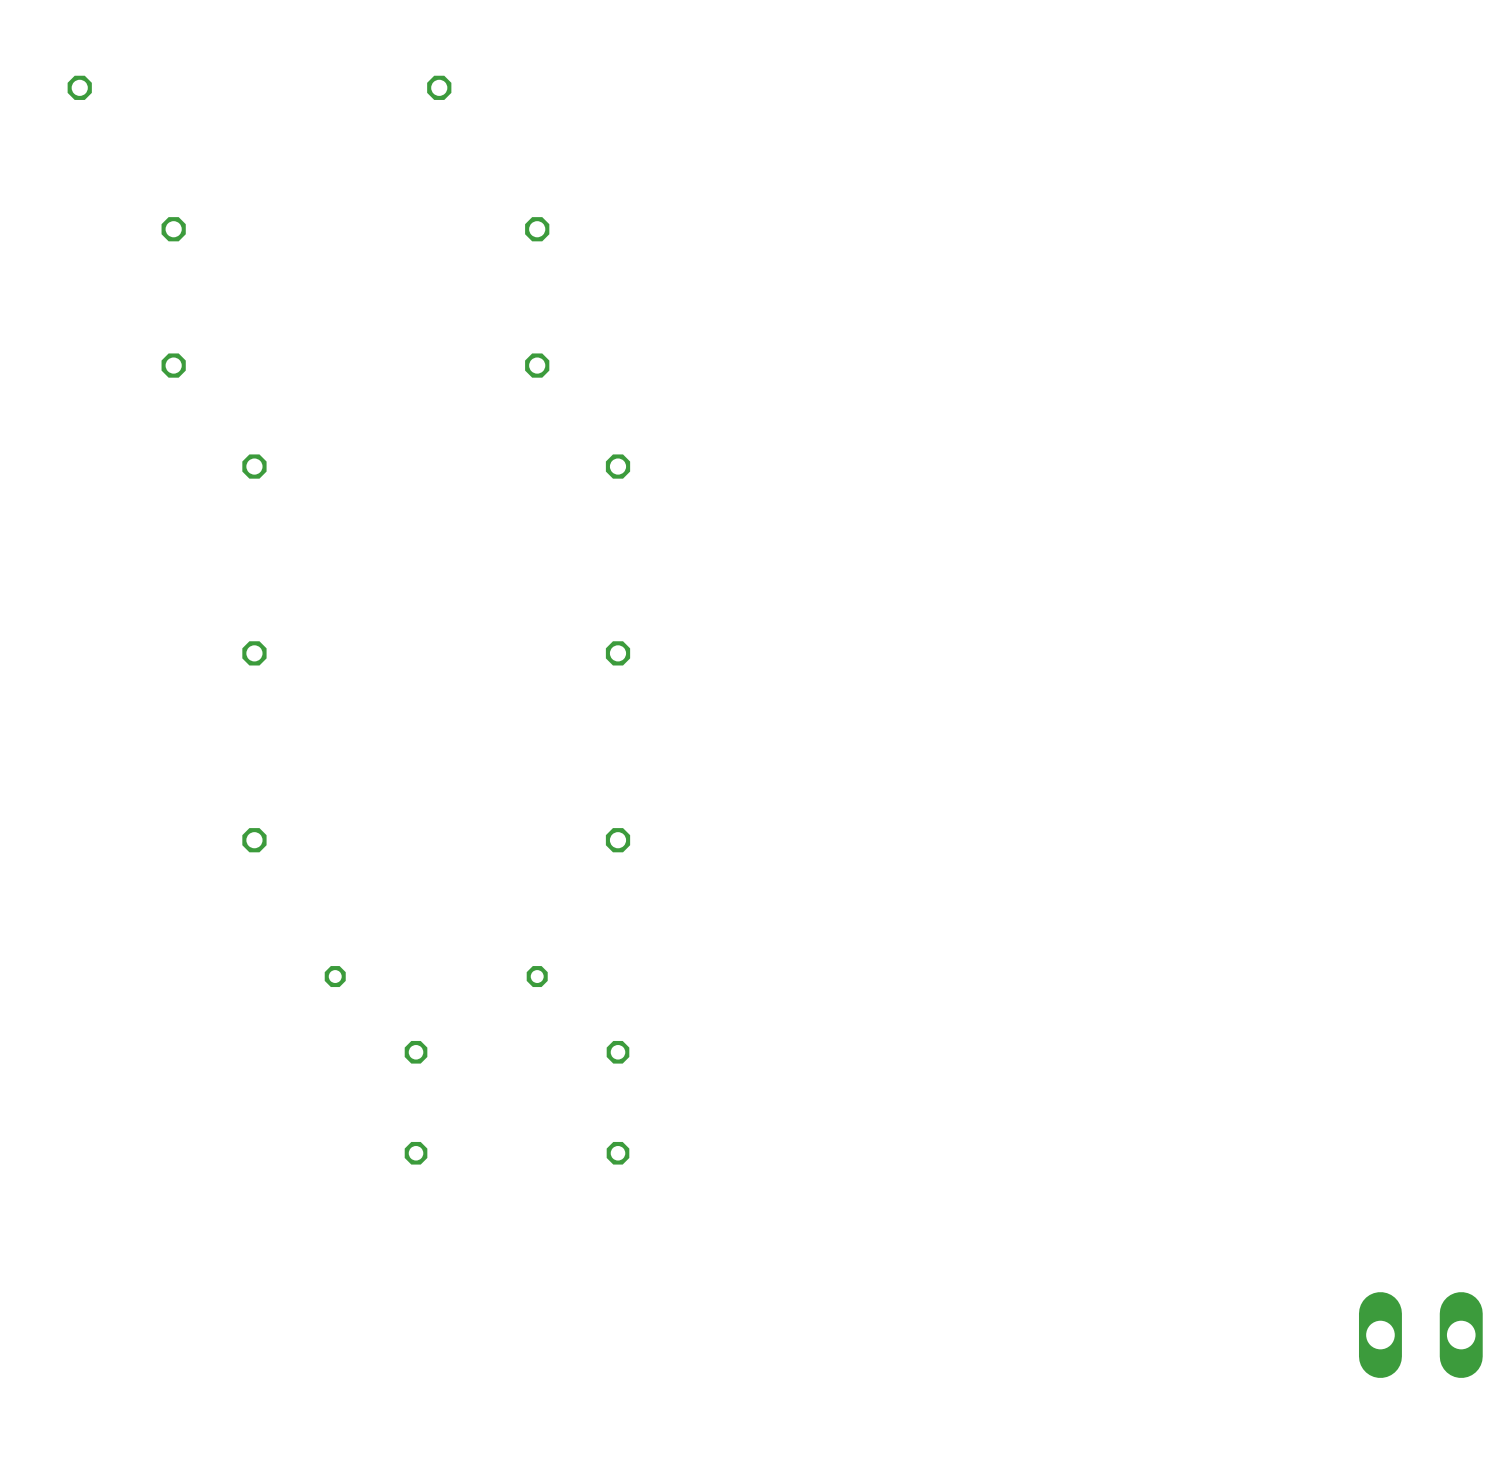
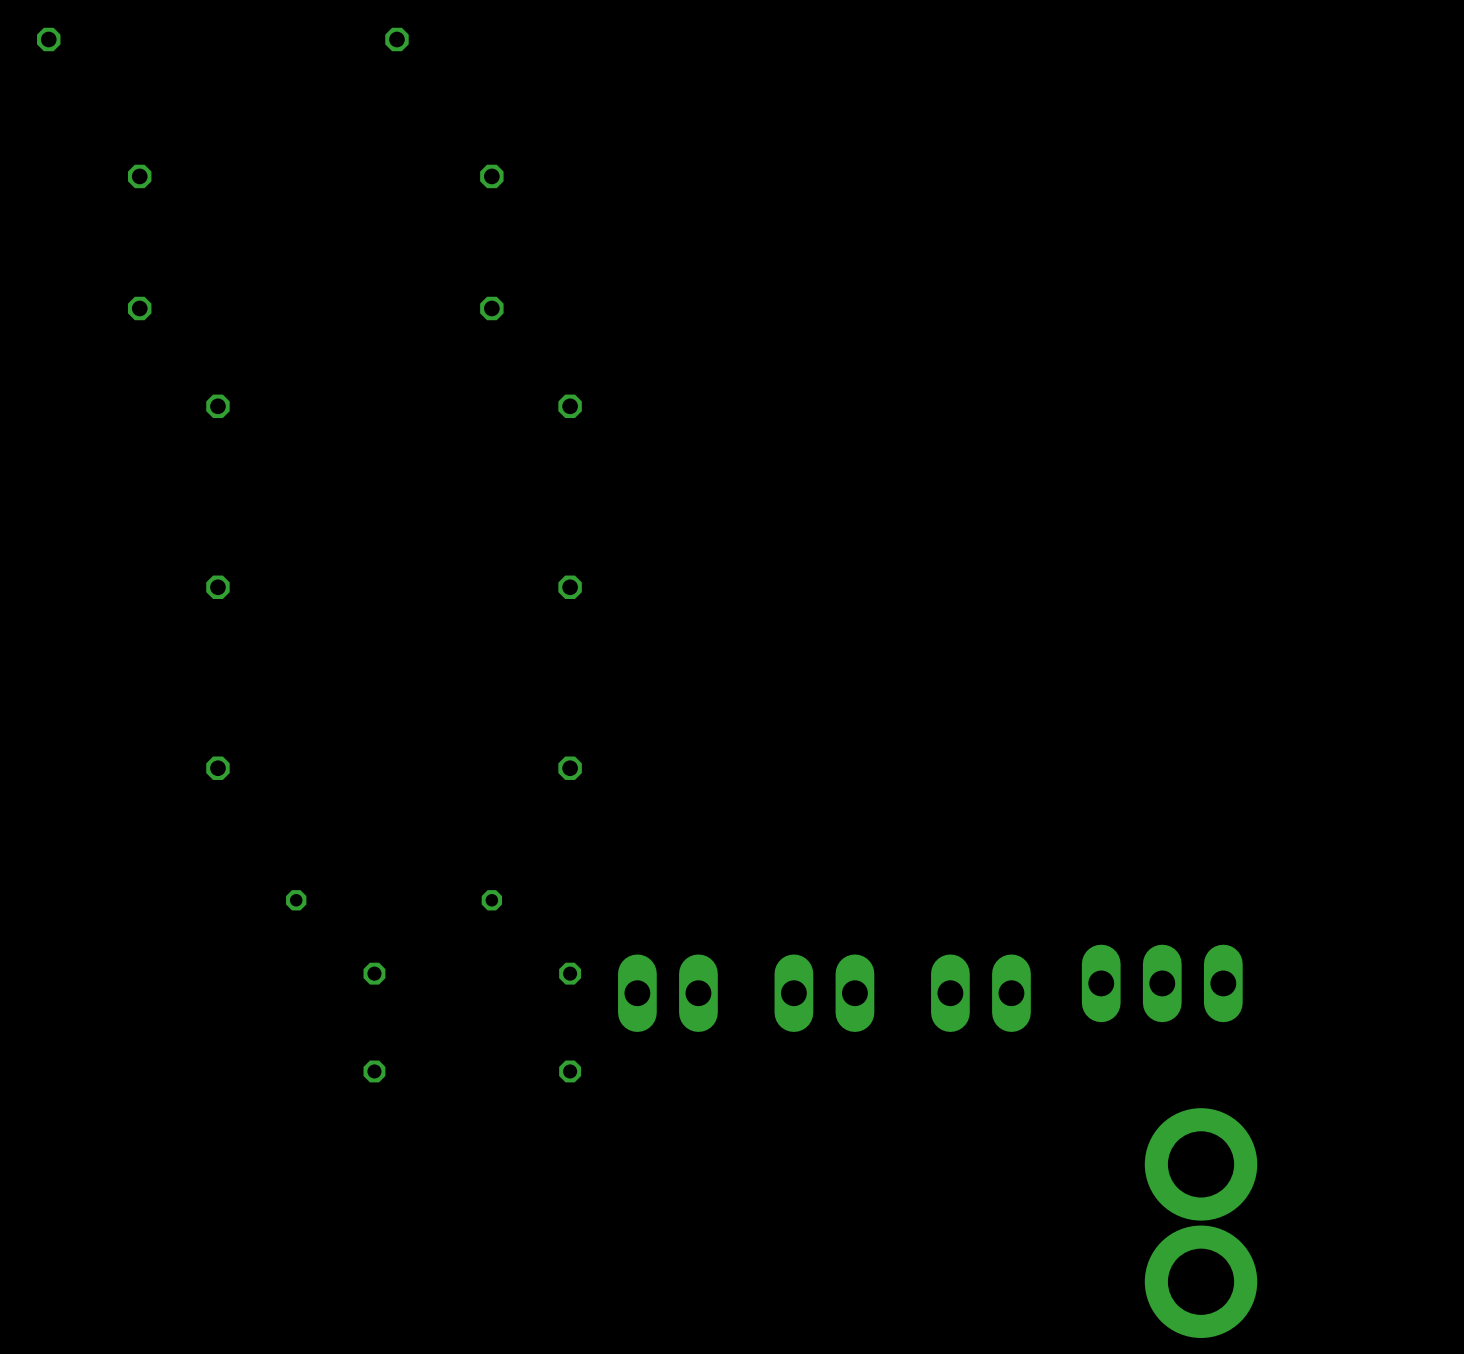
part: none -> (1162, 983)
part: none -> (667, 993)
part: none -> (824, 993)
part: none -> (980, 993)
part: none -> (1201, 1164)
part: (1420, 1335) -> none
part: none -> (1201, 1281)

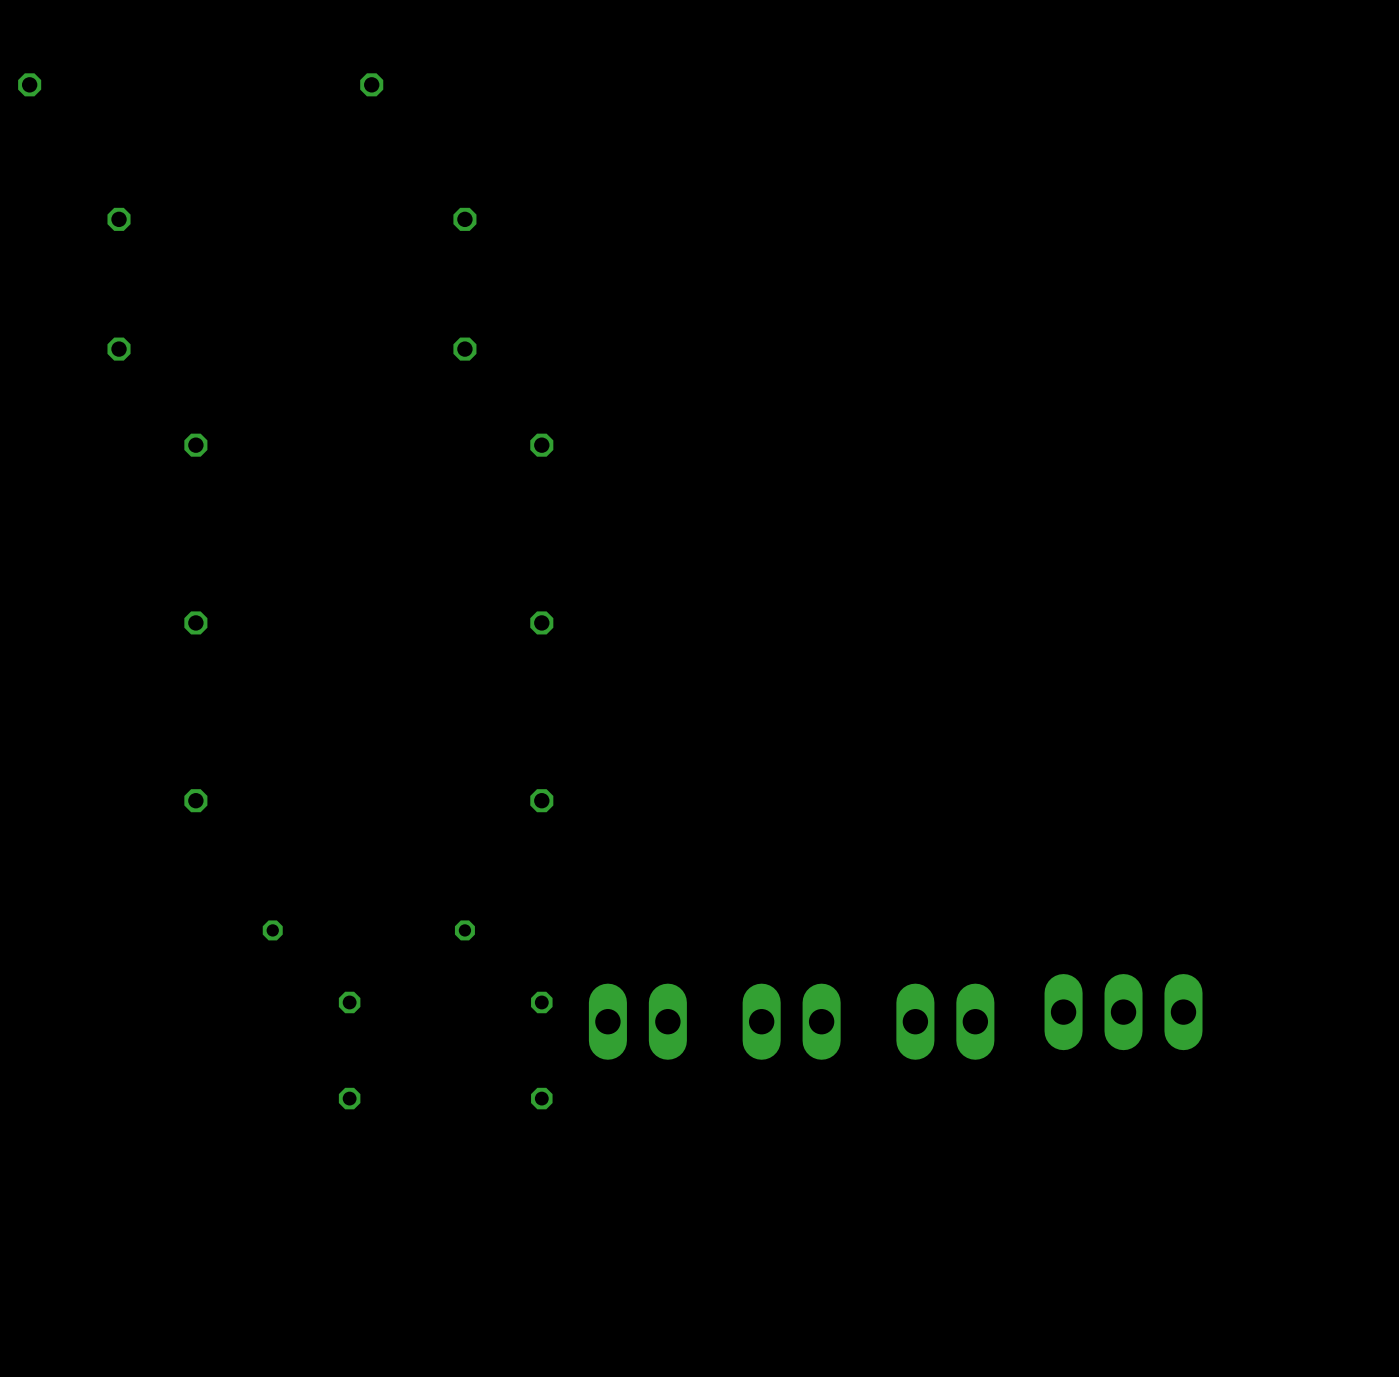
part: (1201, 1164) -> none
part: (1201, 1281) -> none

